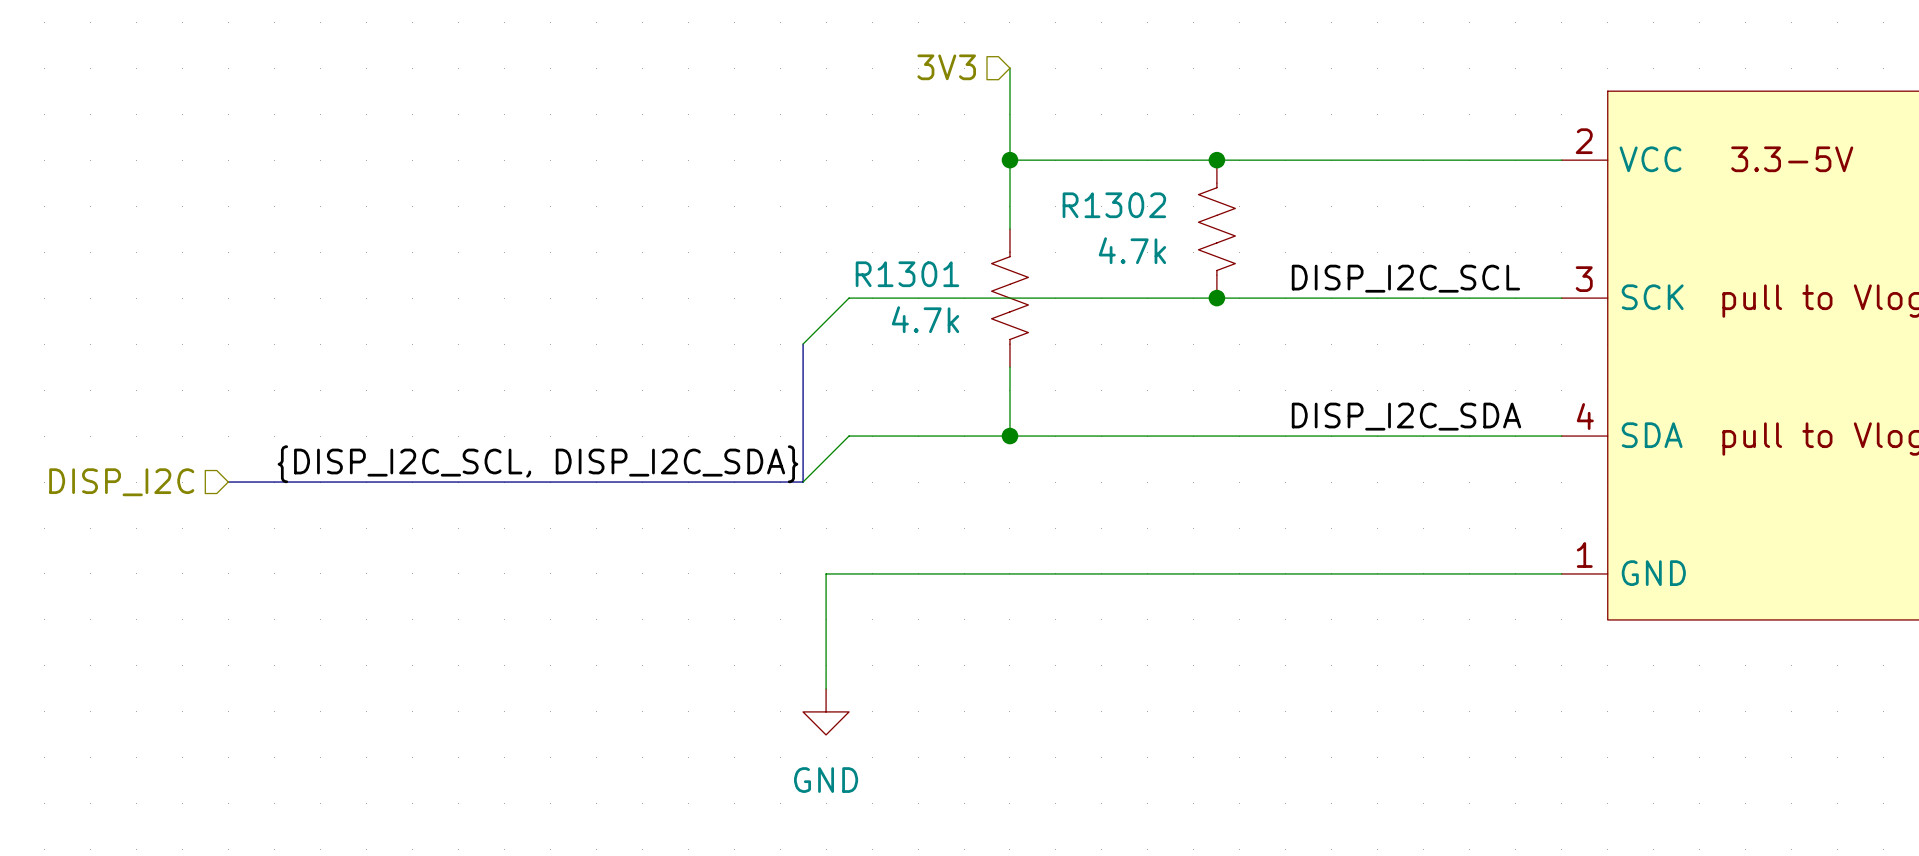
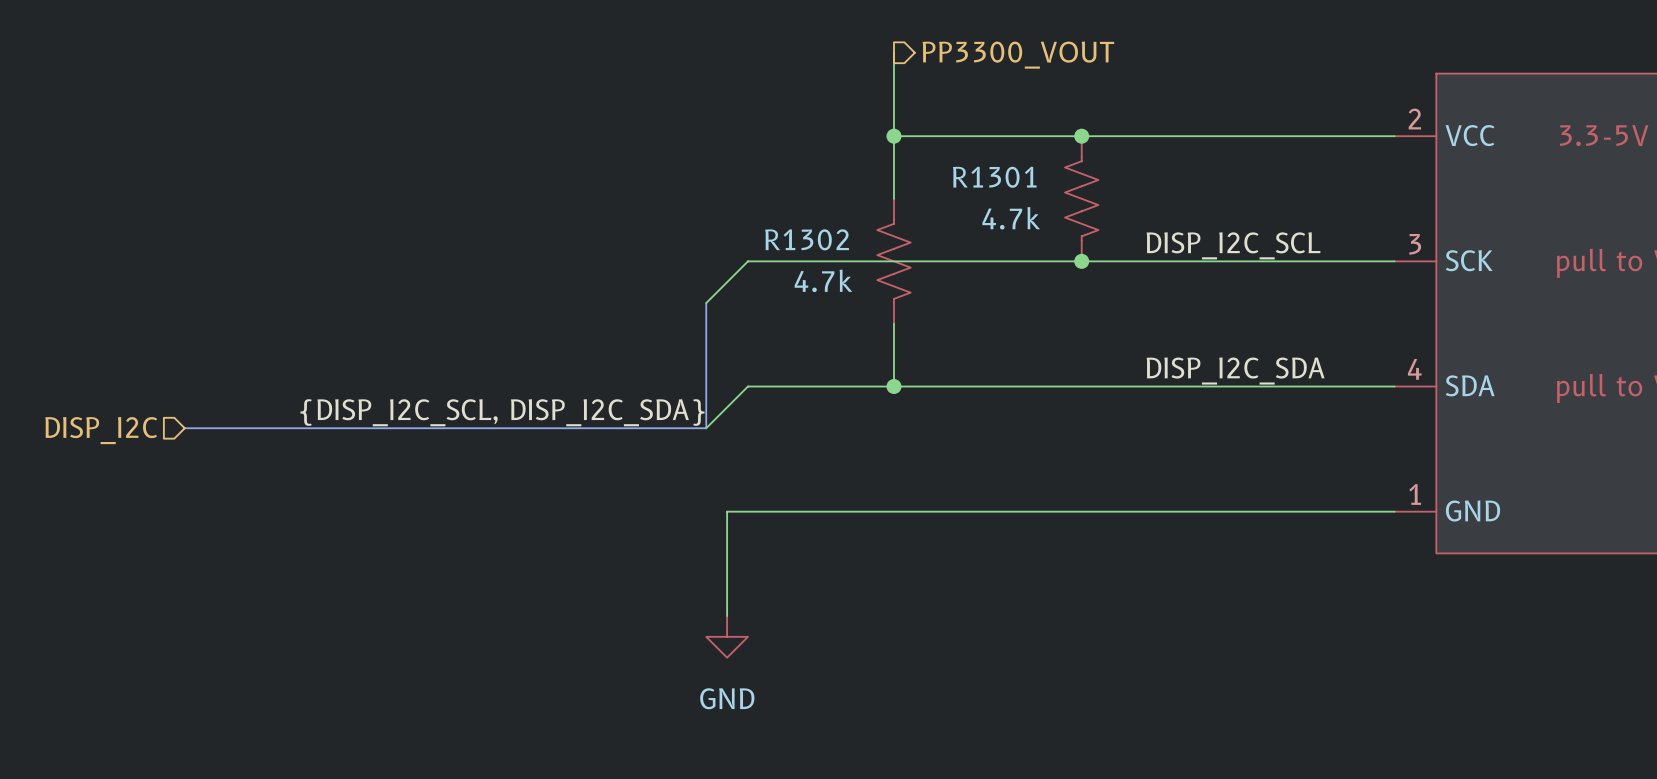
hierarchical label: 3V3 (946, 67) -> none
hierarchical label: none -> PP3300_VOUT (1018, 55)
R1302 name: R1302 (1114, 205) -> R1301 (994, 177)
R1301 name: R1301 (907, 274) -> R1302 (807, 239)

